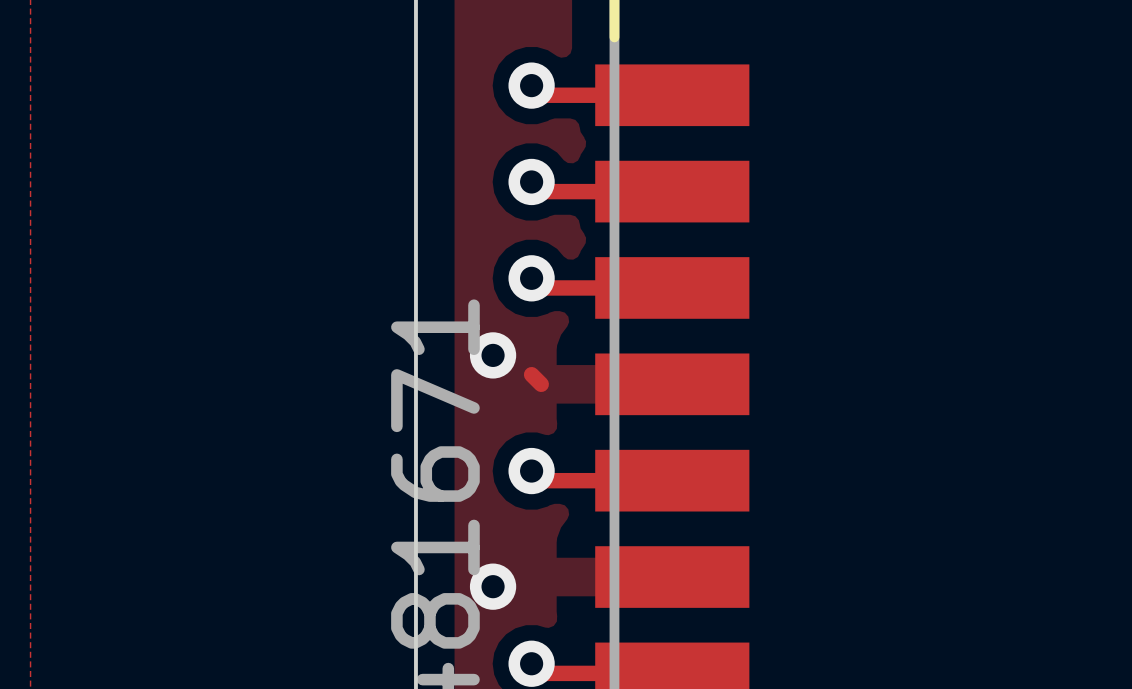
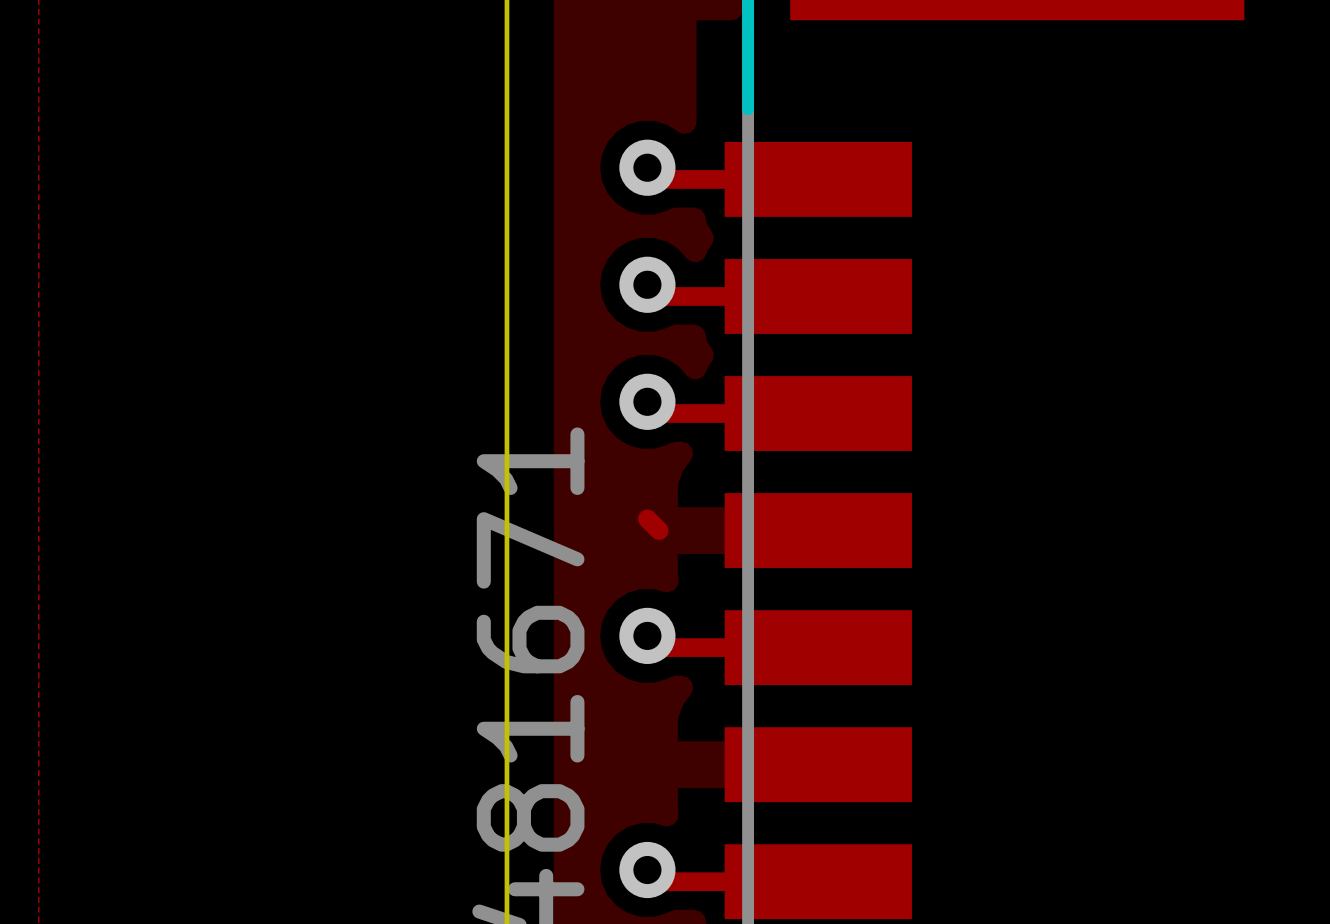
via: (493, 355) -> none
via: (493, 586) -> none

